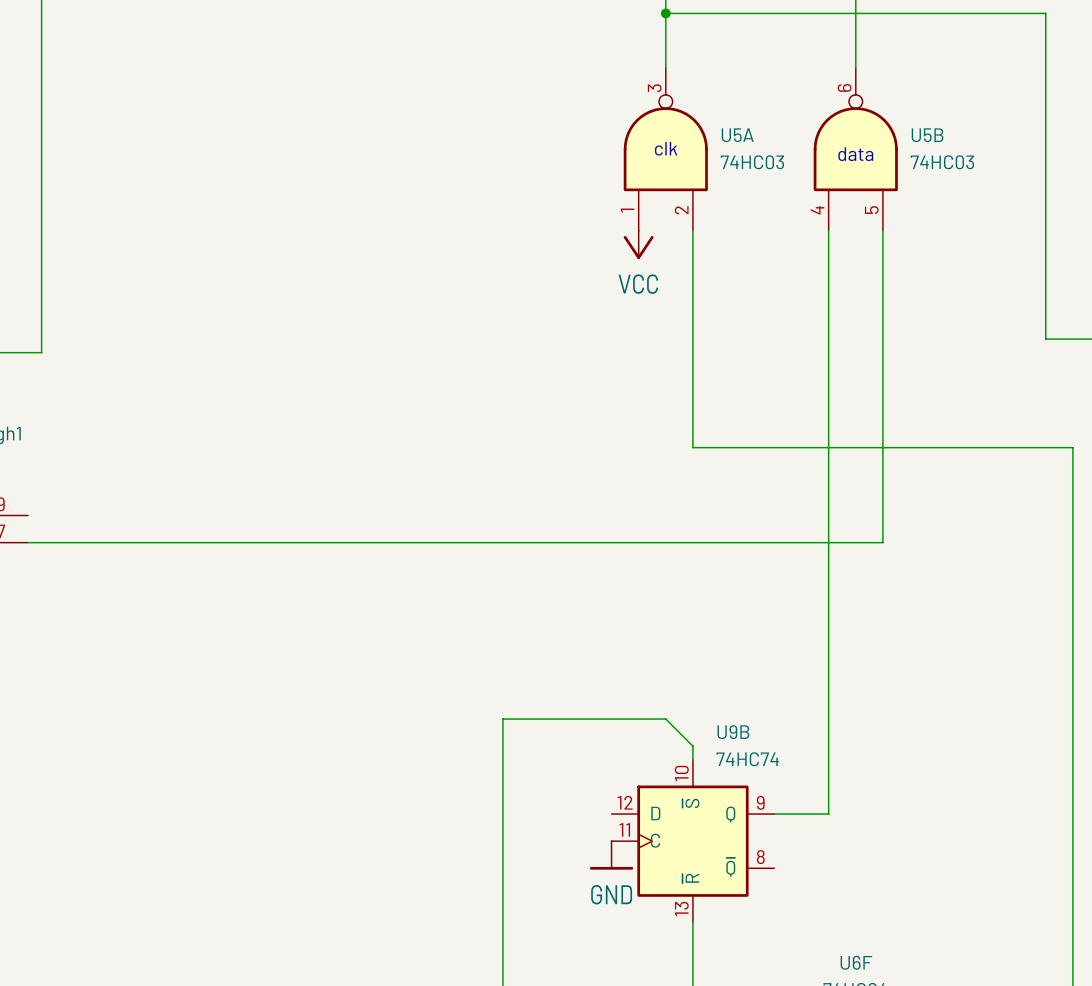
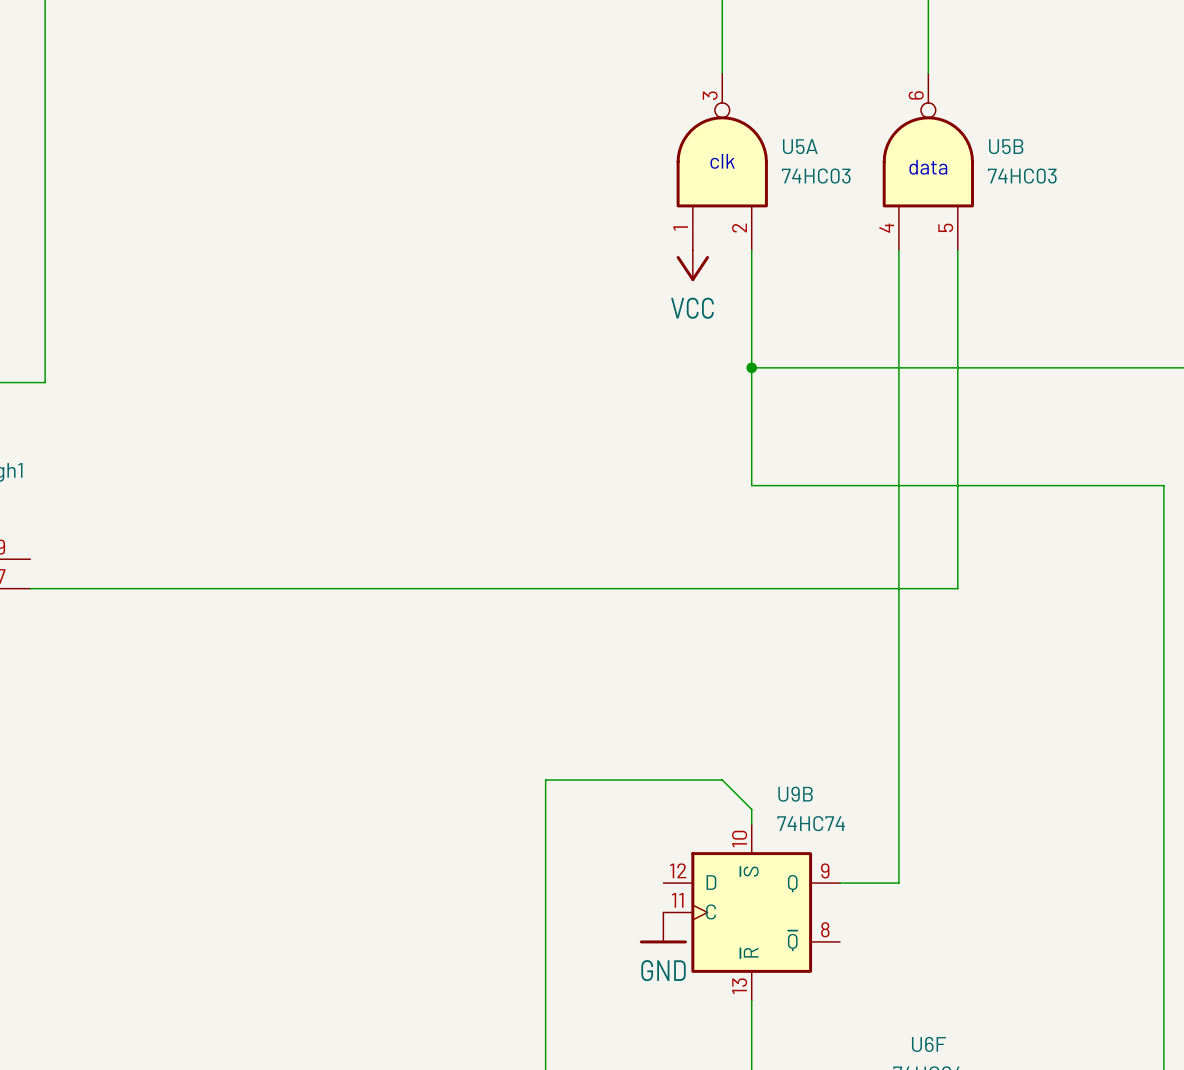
wire: (665, 13) (1045, 13) (1045, 339) -> (751, 367) (1134, 367)
junction: (665, 13) -> none
junction: none -> (751, 367)

